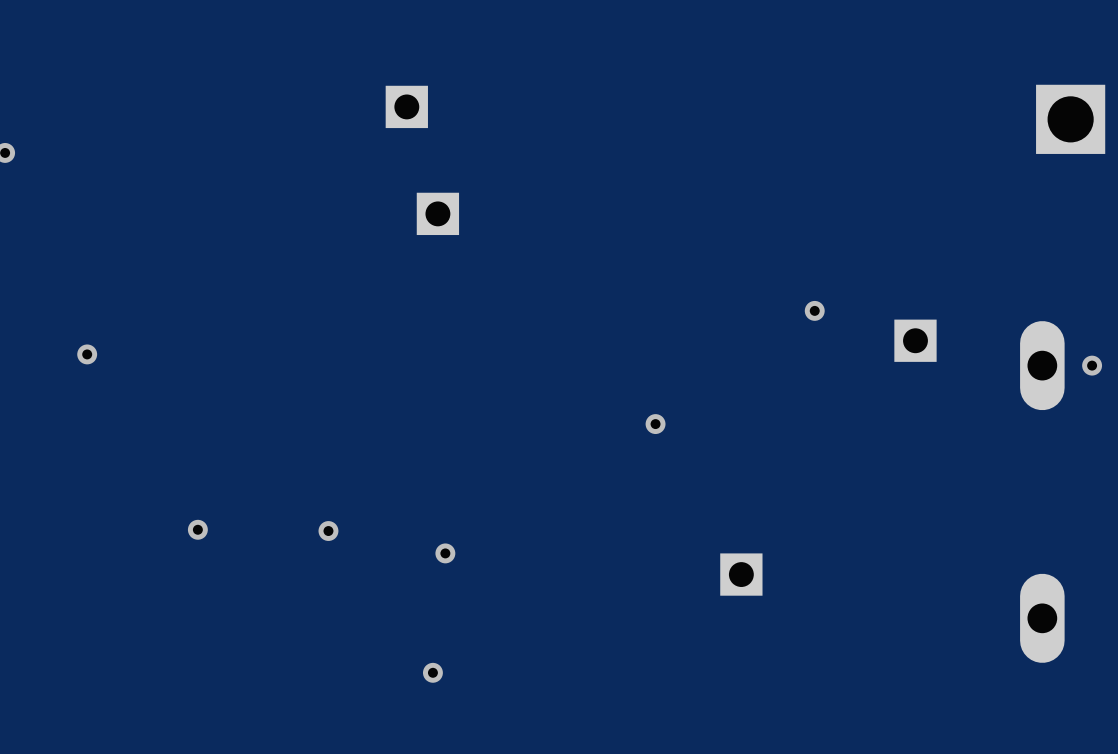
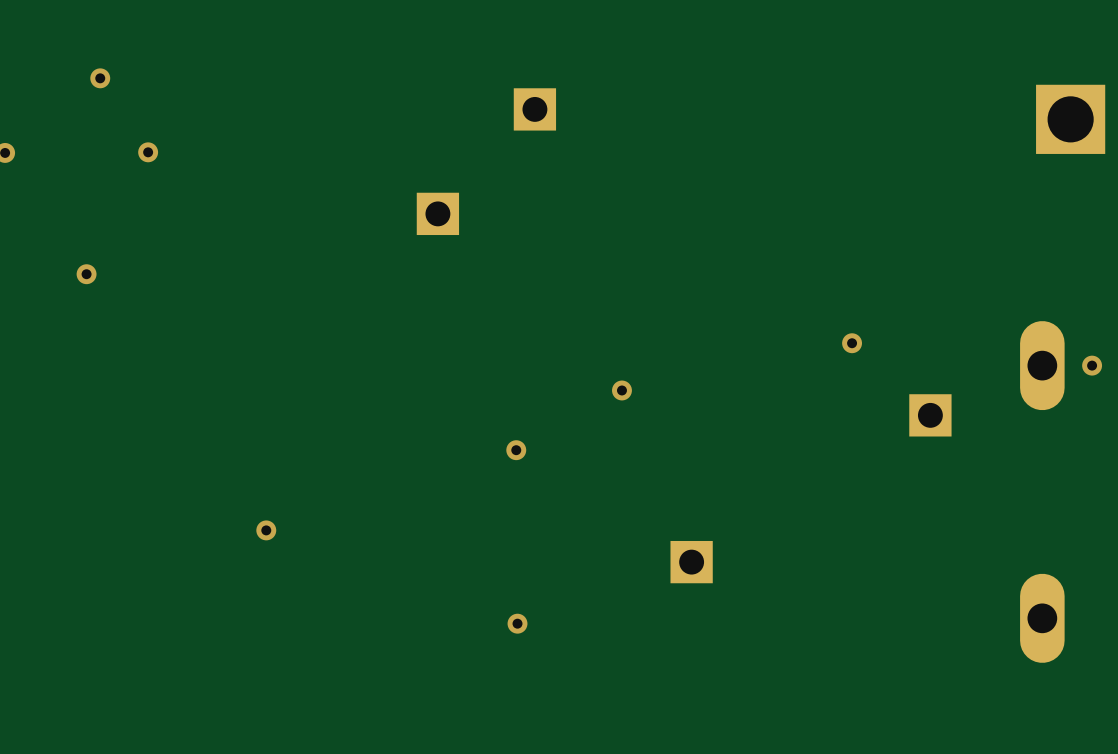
via: none -> (100, 78)
part position: (406, 106) -> (534, 109)
via: none -> (148, 152)
via position: (814, 310) -> (852, 343)
part position: (915, 340) -> (930, 415)
via position: (87, 354) -> (86, 274)
via position: (655, 424) -> (621, 390)
via: none -> (516, 450)
via: (197, 529) -> none
via: none -> (266, 530)
via: (328, 531) -> none
via: (445, 553) -> none
part position: (741, 574) -> (691, 562)
via: none -> (517, 623)
via: (432, 672) -> none

